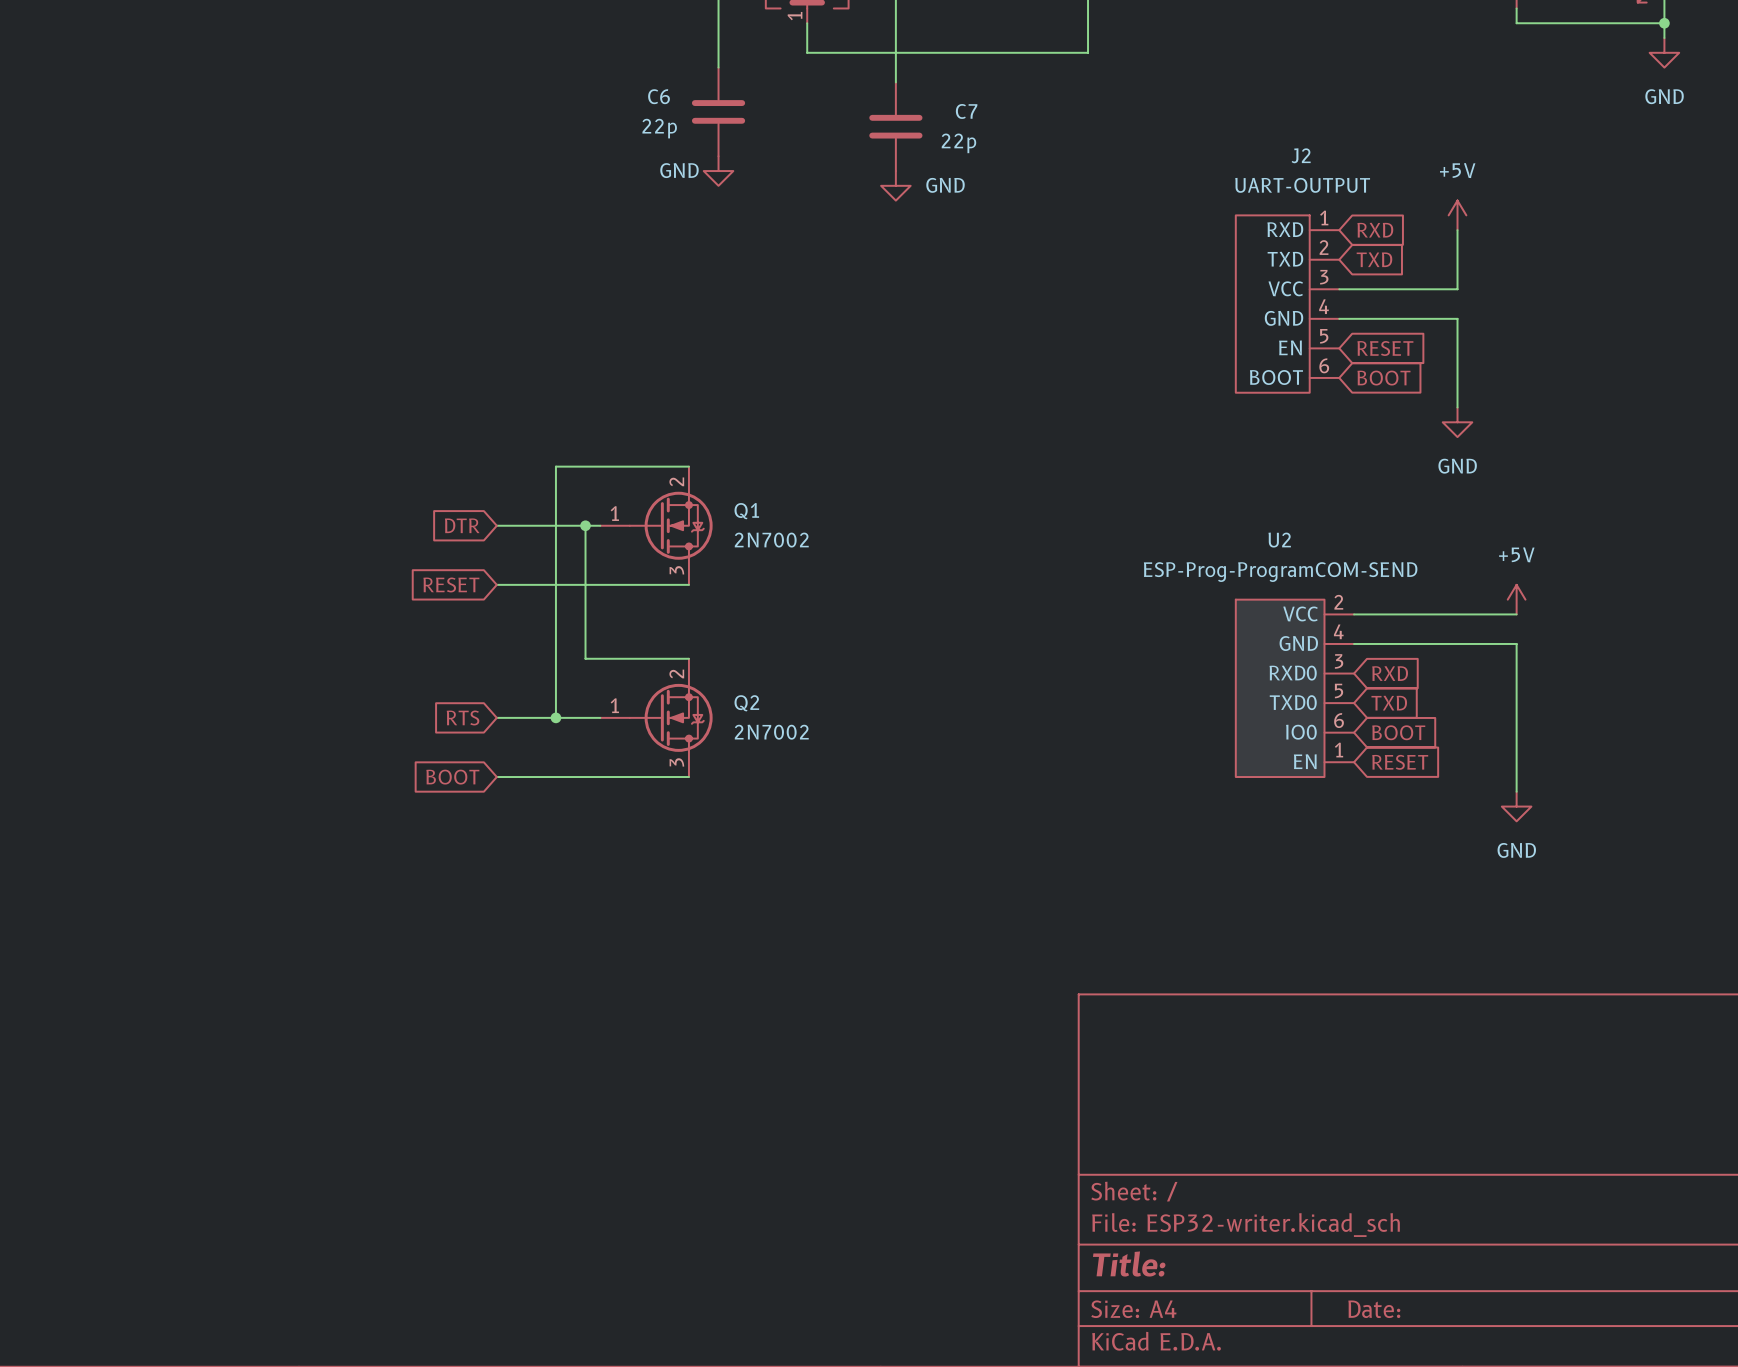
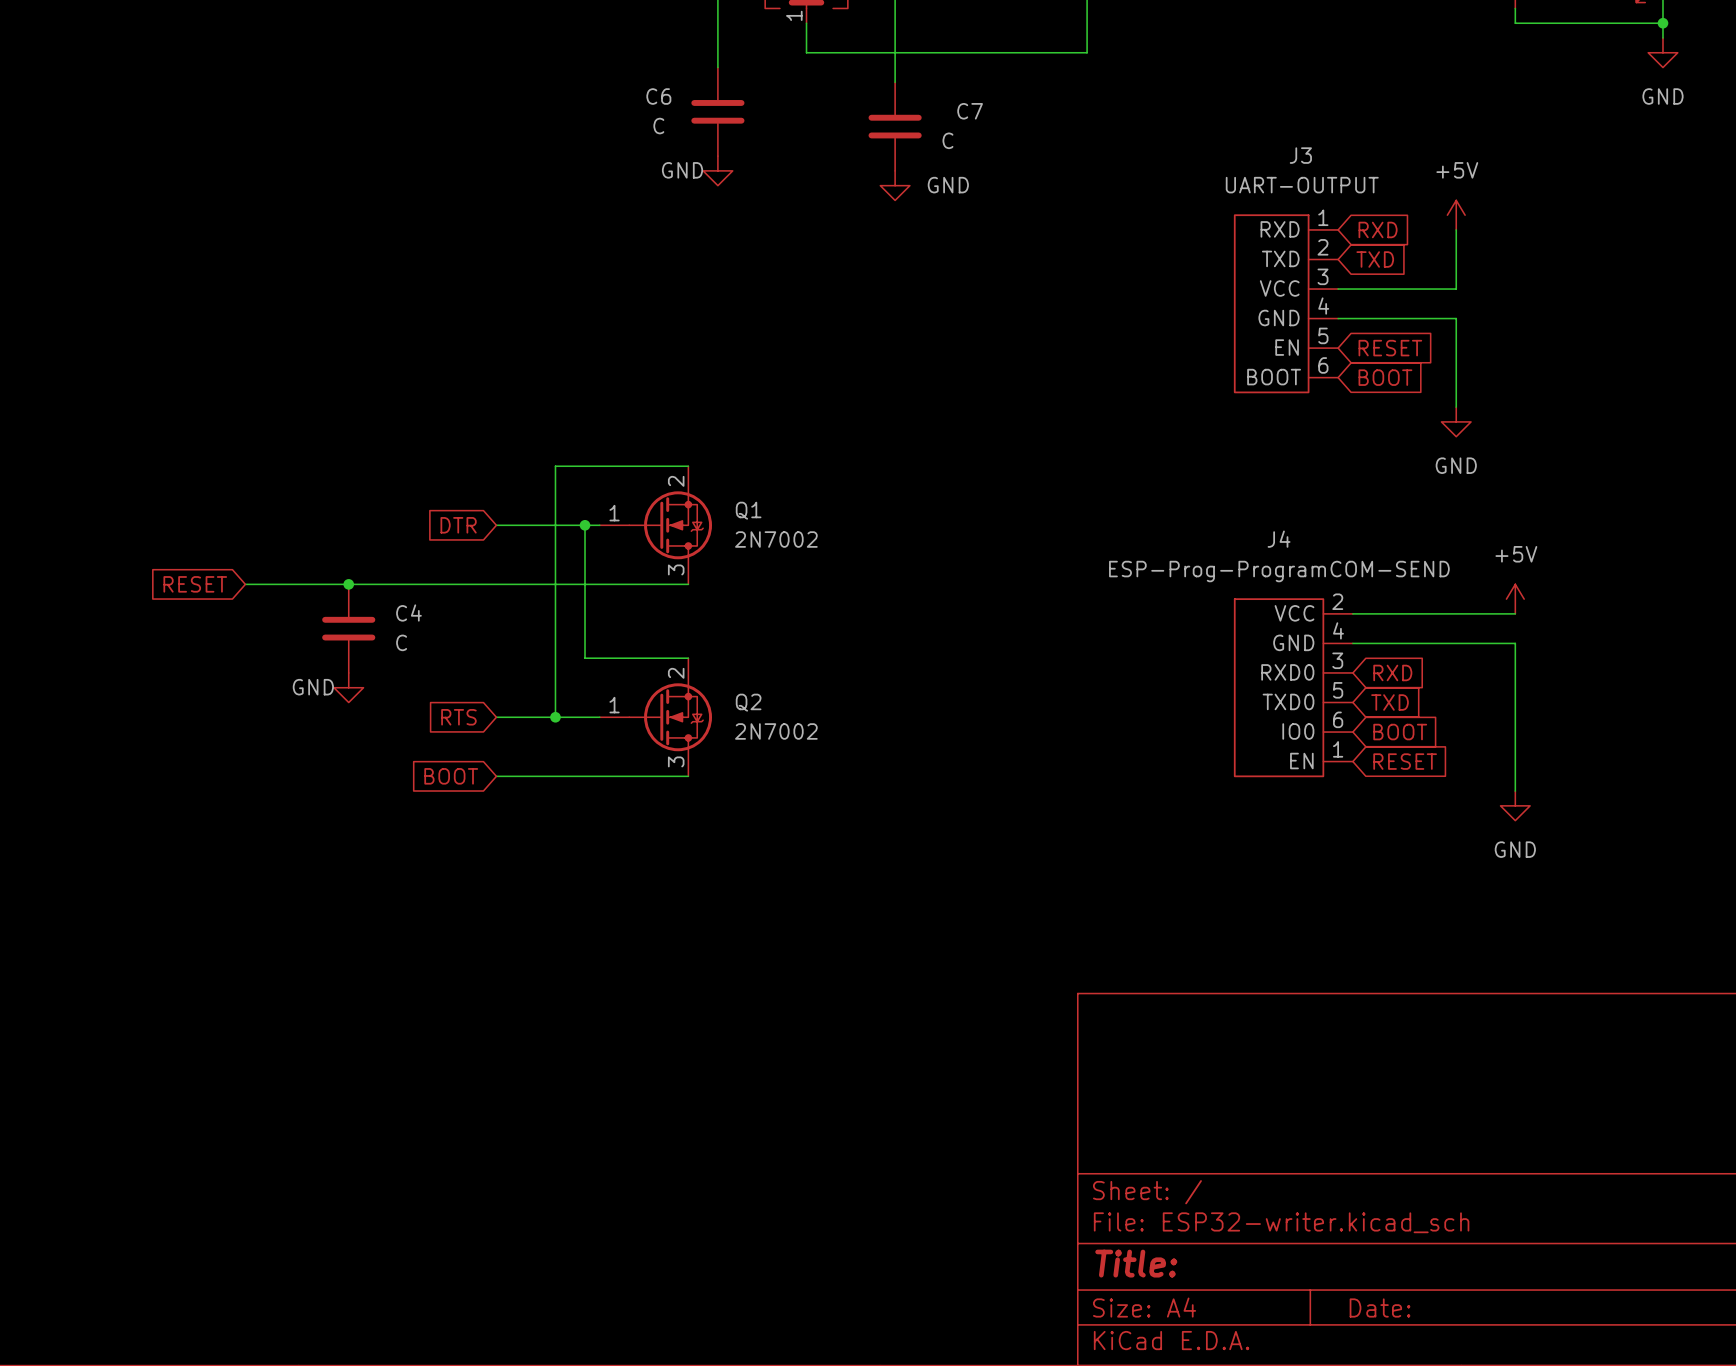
C6 value: 22p (659, 128) -> C (658, 126)
C7 value: 22p (958, 143) -> C (947, 140)
J2 name: J2 (1301, 155) -> J3 (1300, 155)
U2 name: U2 (1279, 540) -> J4 (1279, 539)
wire: none -> (245, 584) (496, 584)
junction: none -> (348, 584)
global label position: RESET (451, 584) -> RESET (195, 584)
C4: none -> C (348, 628)
power symbol: none -> GND (348, 687)

